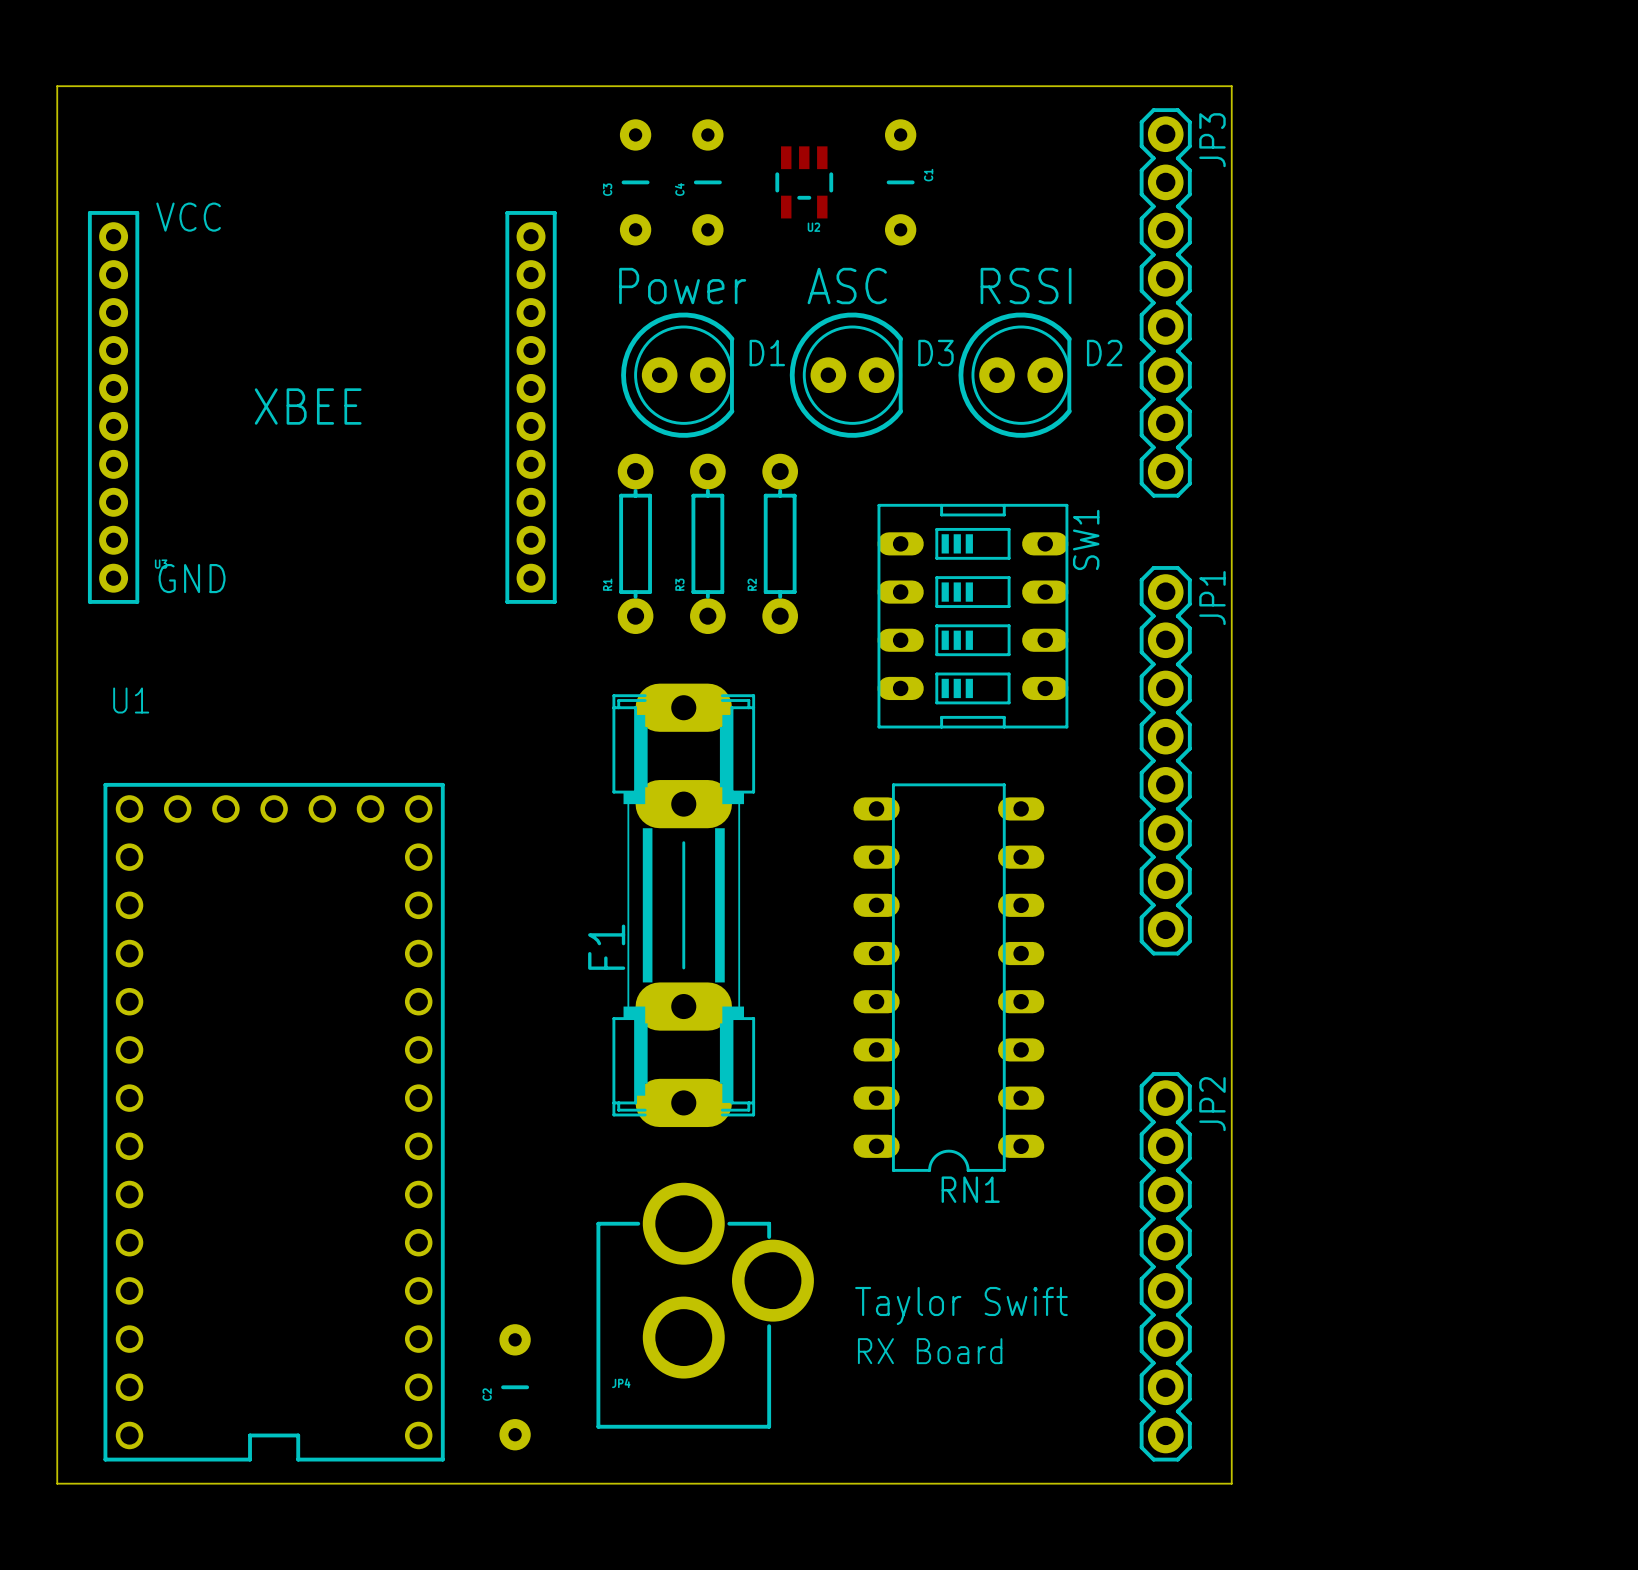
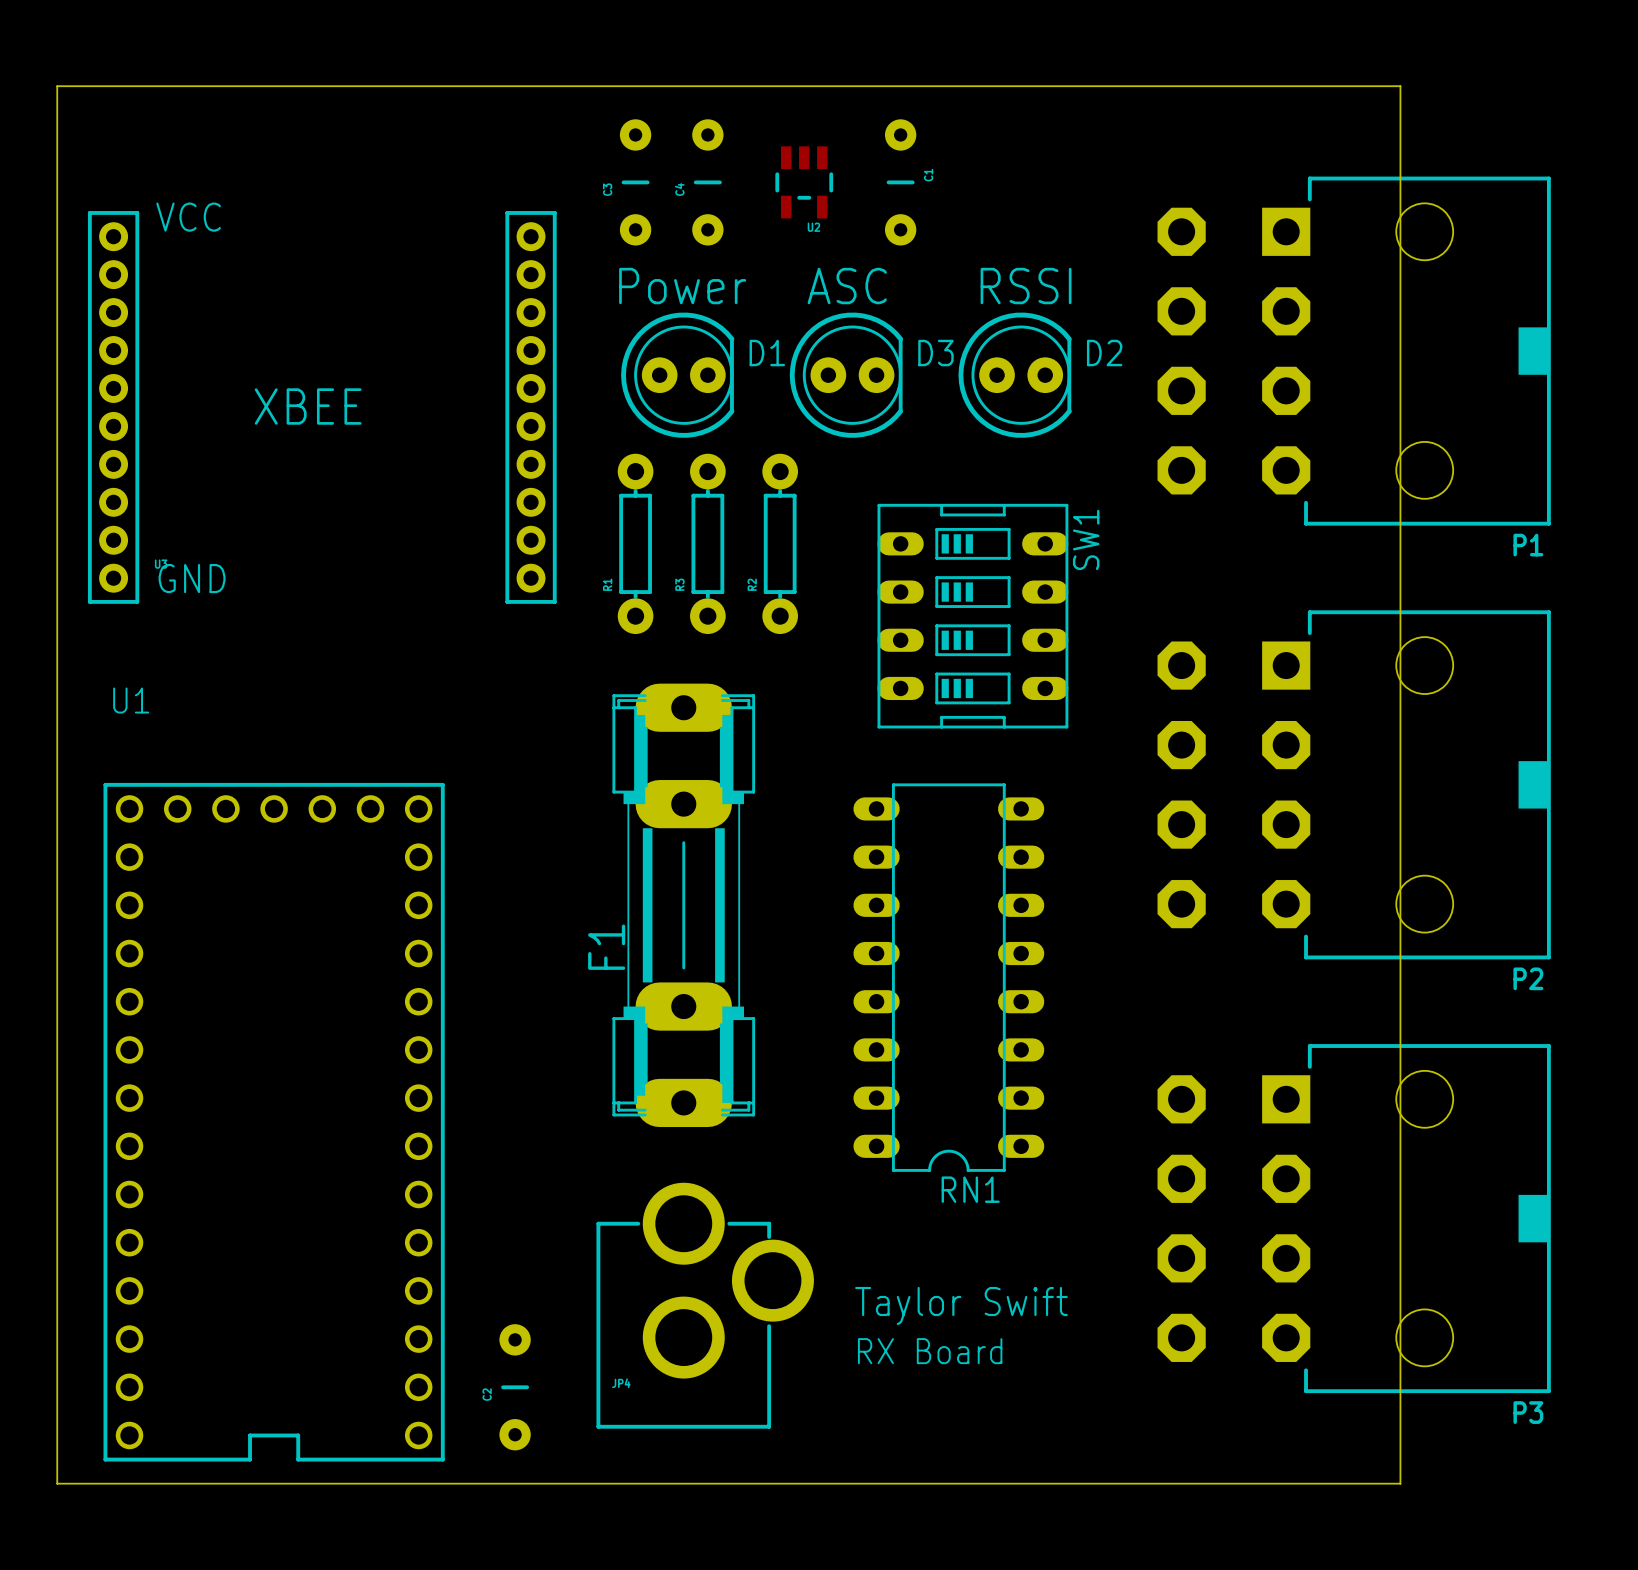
board edge: (1231, 86) (1231, 1483) -> (1231, 86) (1400, 86) (1400, 1483) (1231, 1483)
JP3: (1165, 302) -> none
P1: none -> (1354, 351)
JP1: (1165, 760) -> none
P2: none -> (1354, 784)
P3: none -> (1354, 1218)
JP2: (1165, 1266) -> none

